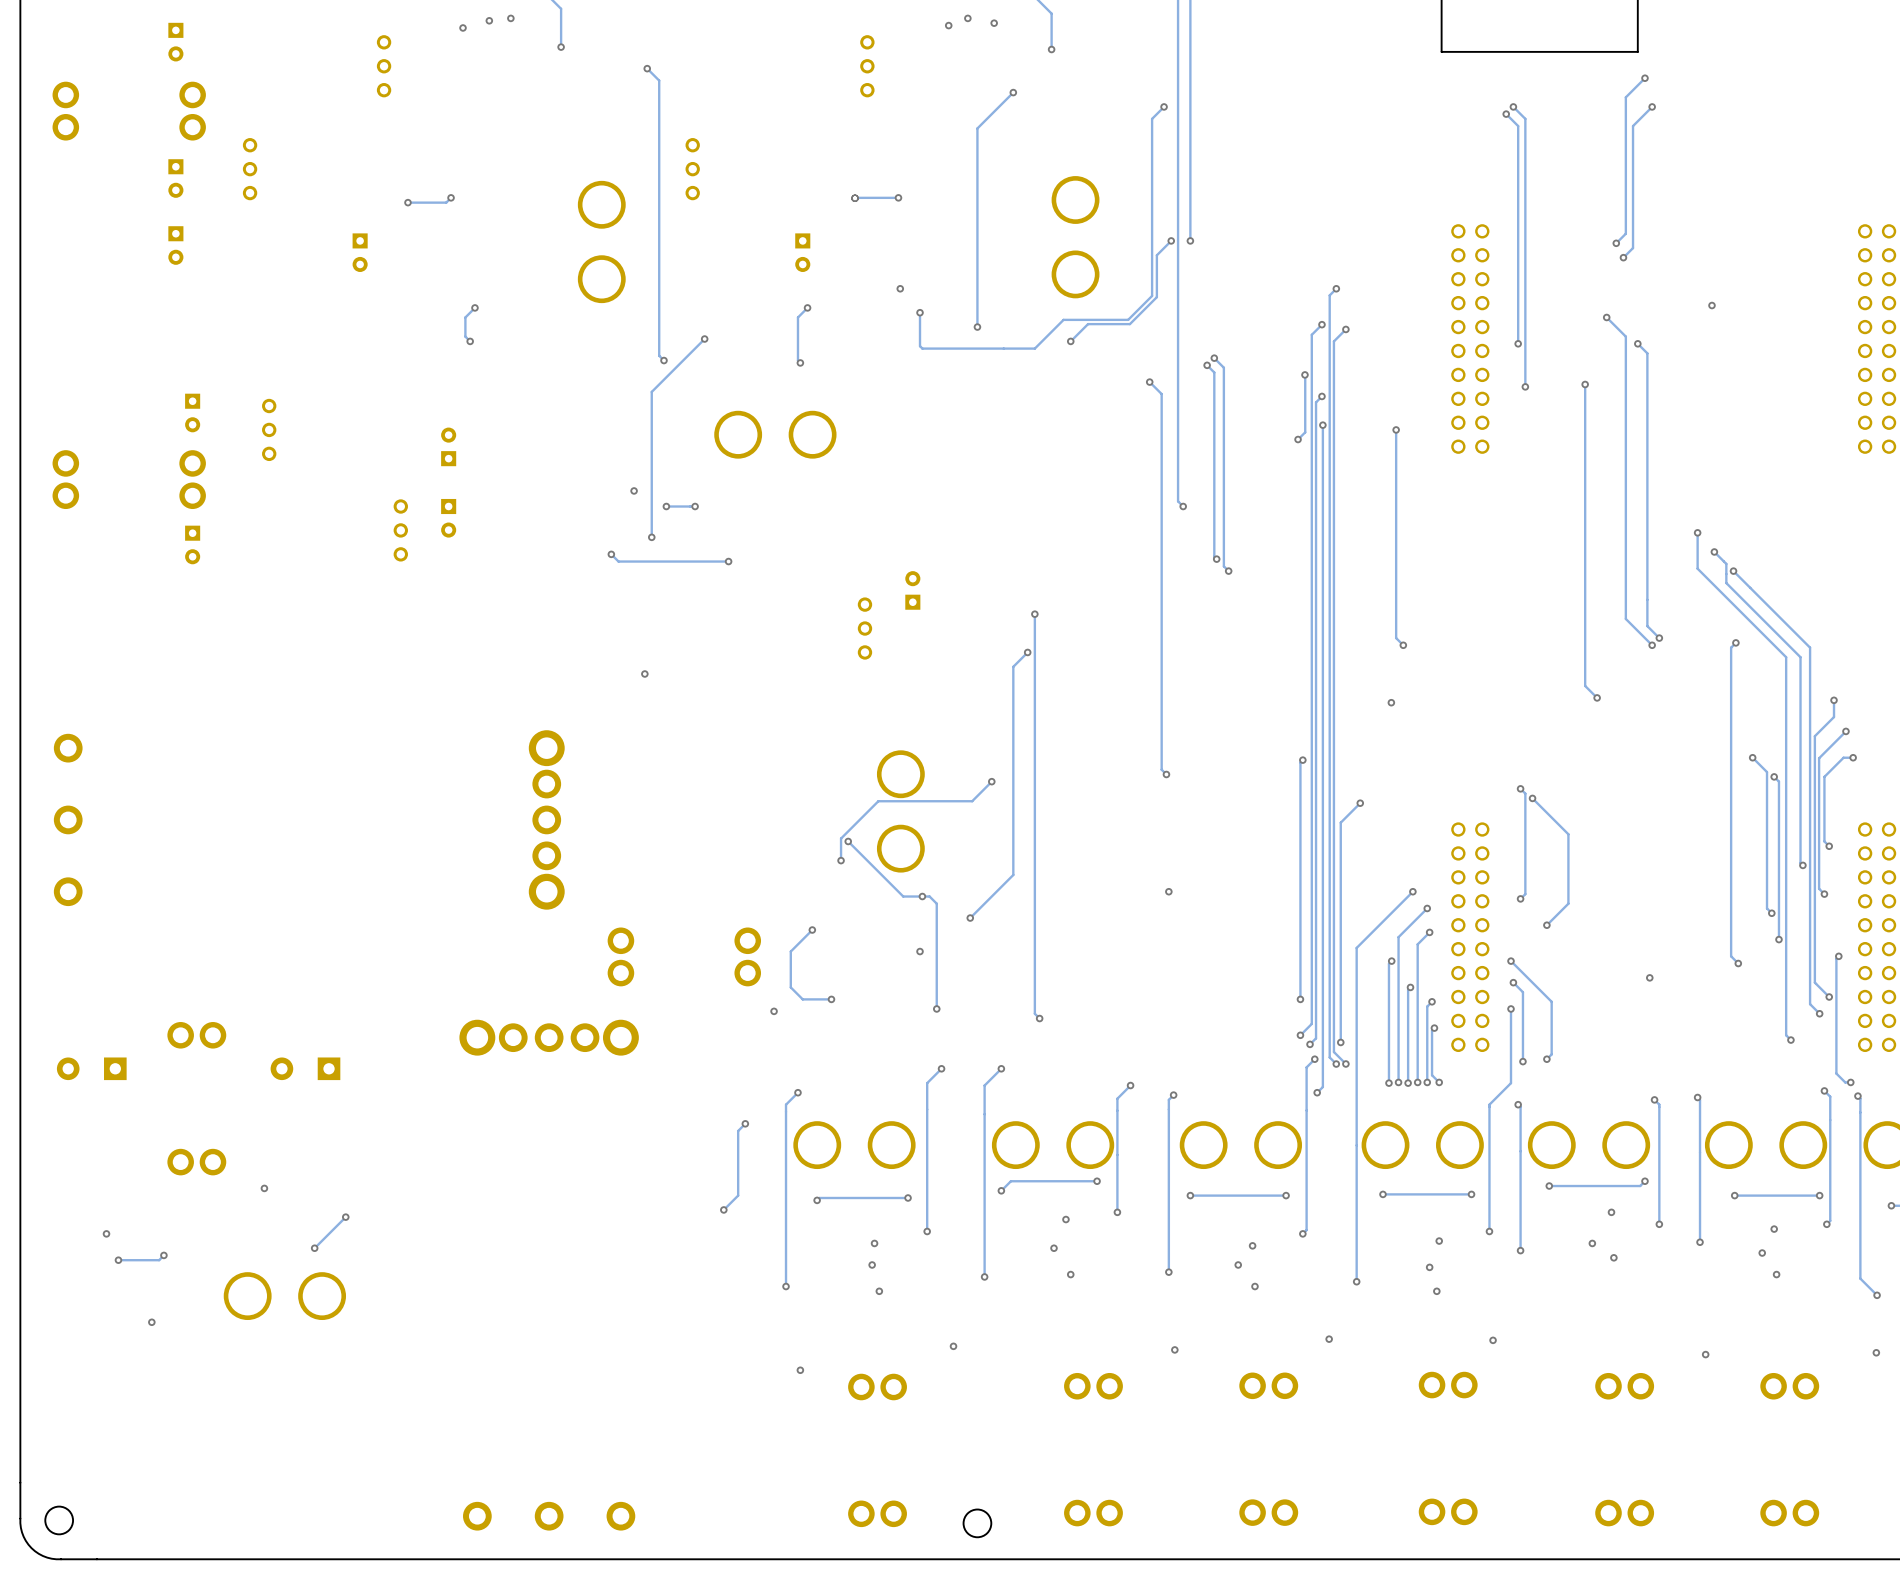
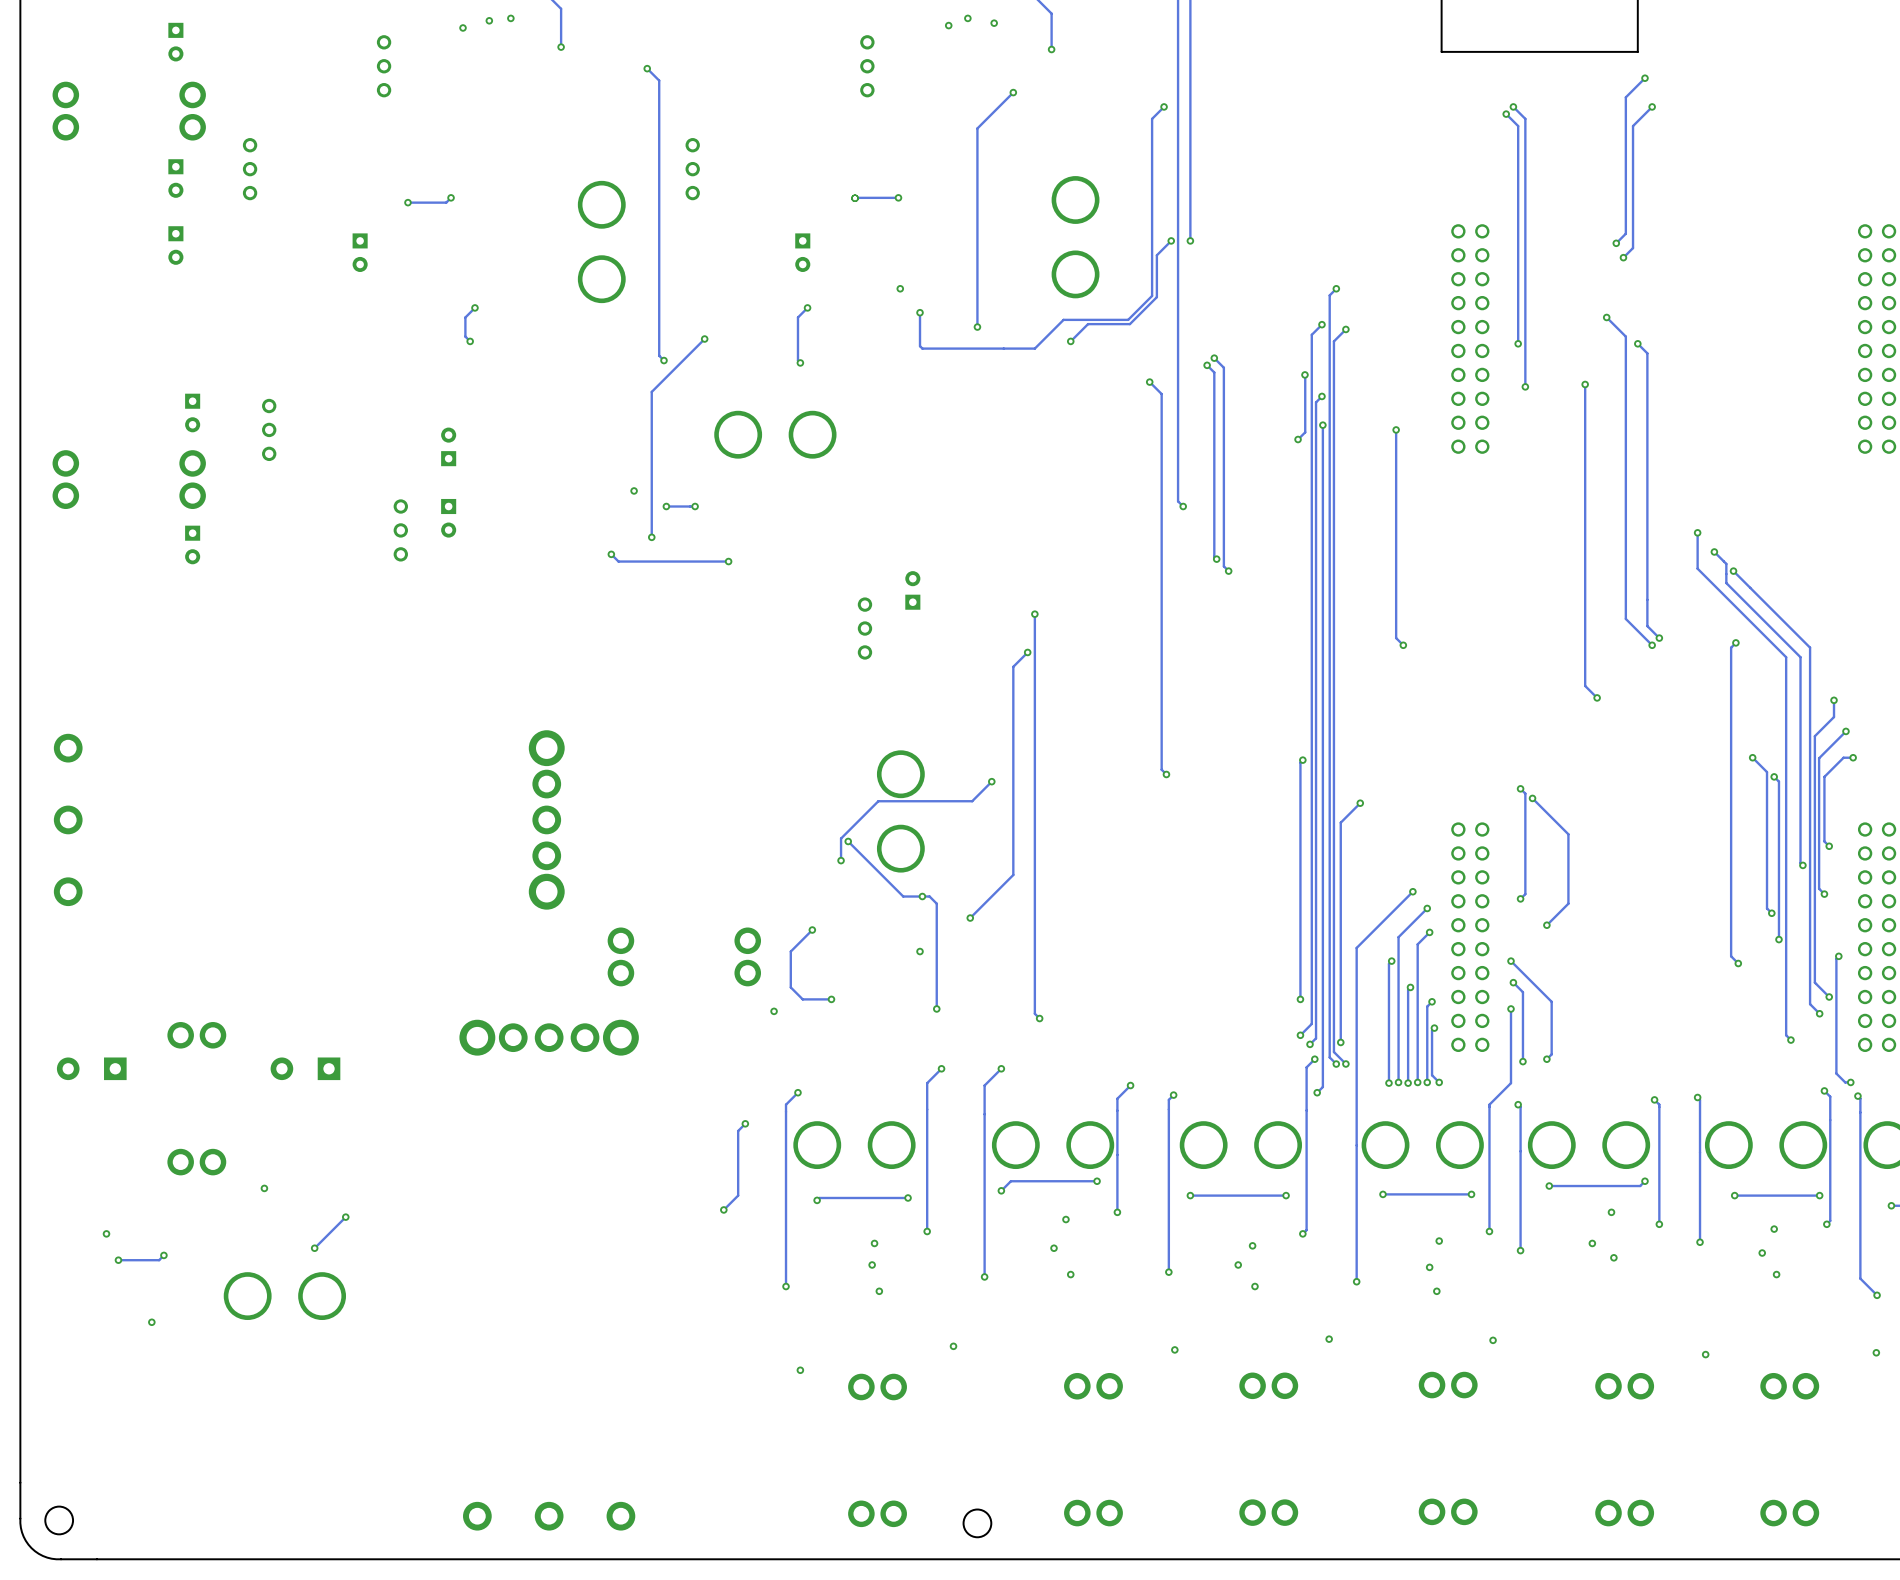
via: (1711, 305) -> none
via: (644, 673) -> none
via: (1391, 702) -> none
via: (1168, 891) -> none
via: (1649, 977) -> none

